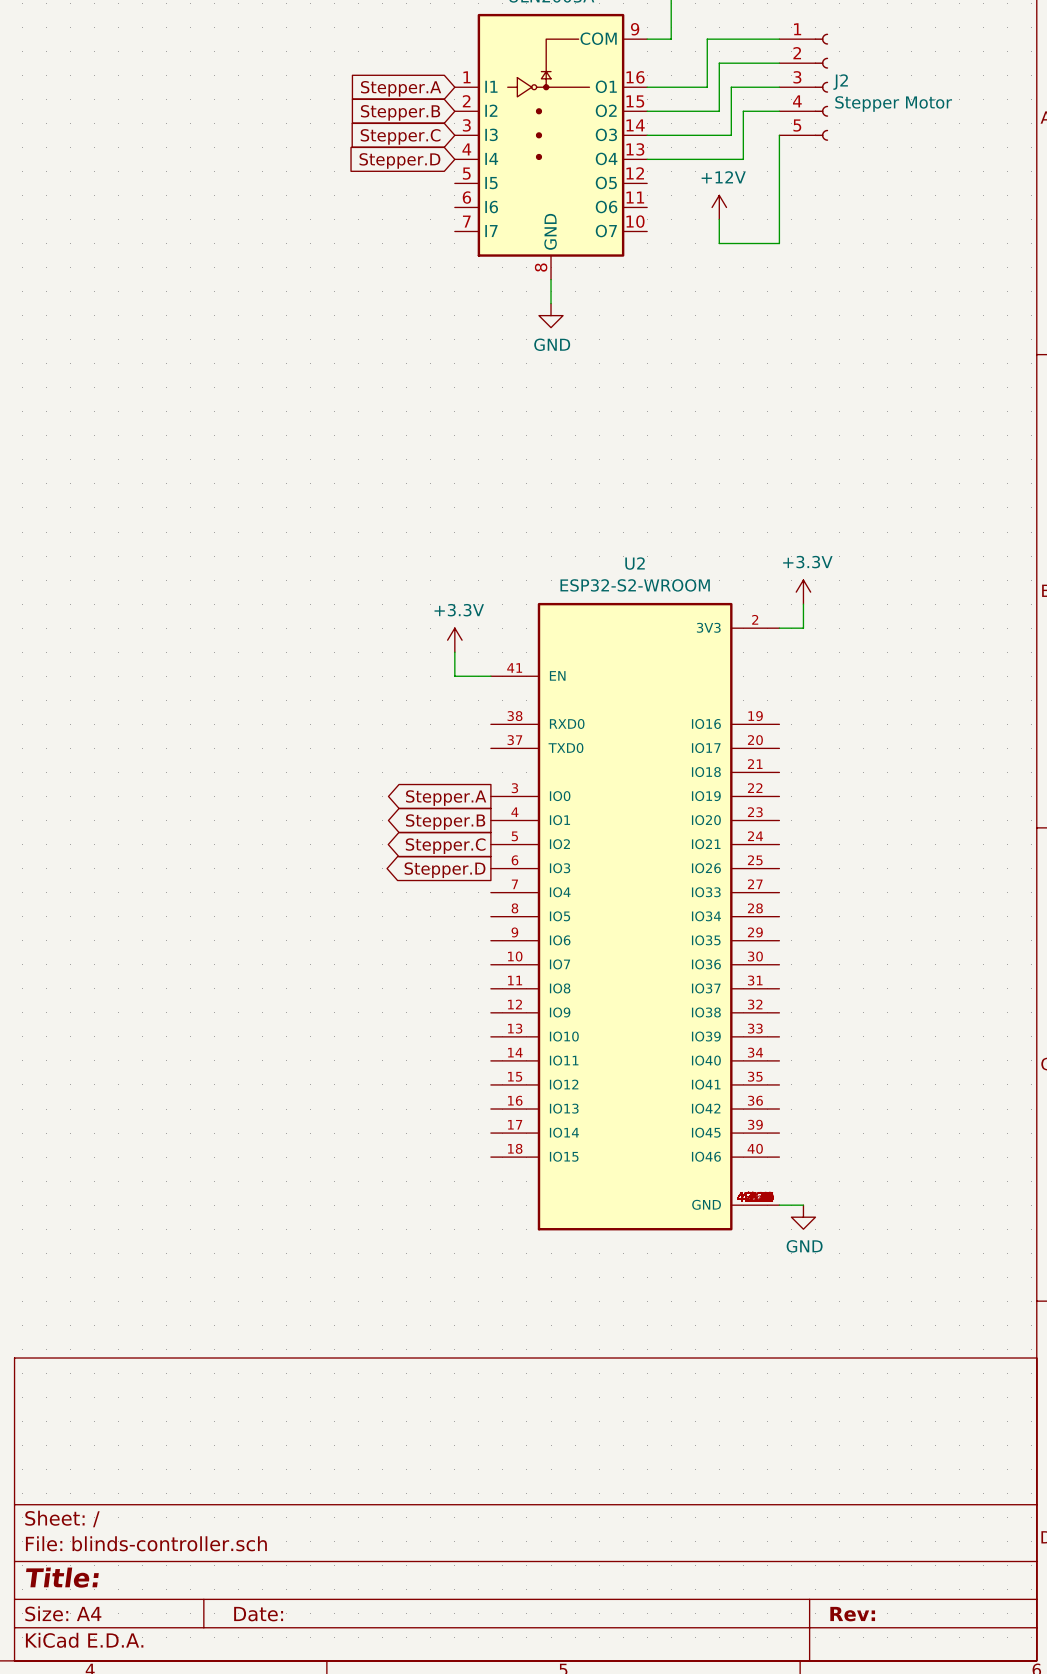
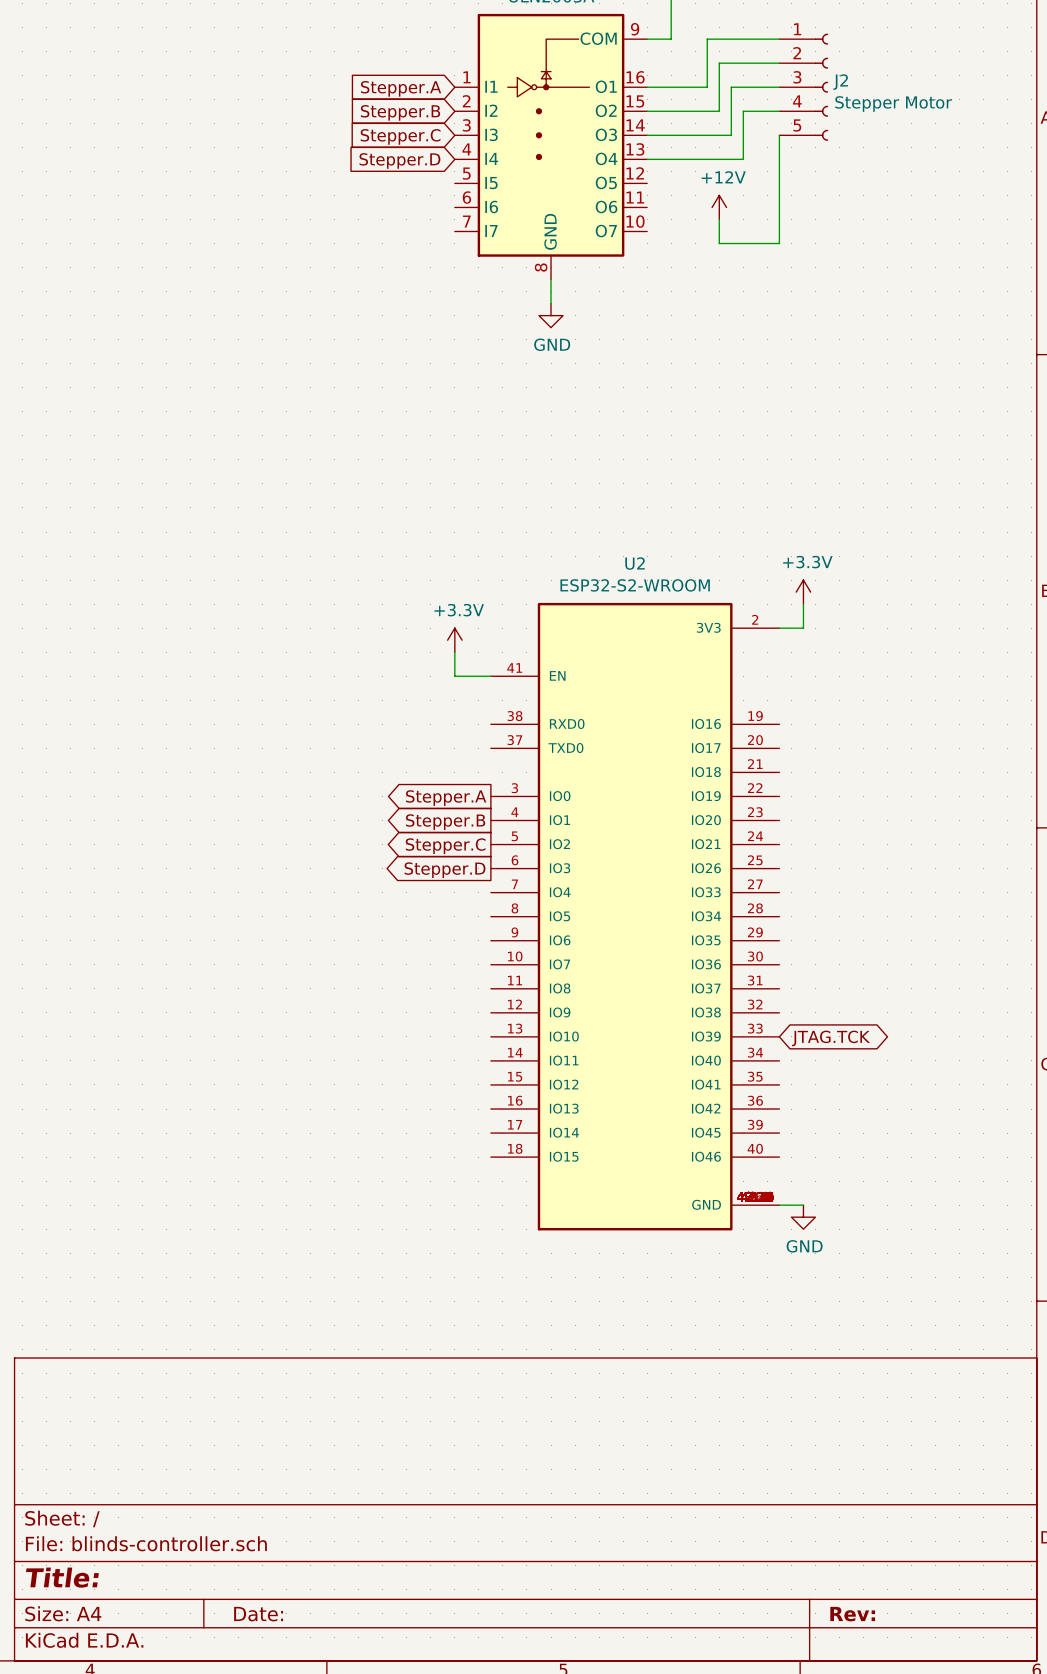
global label: none -> JTAG.TCK (830, 1038)

